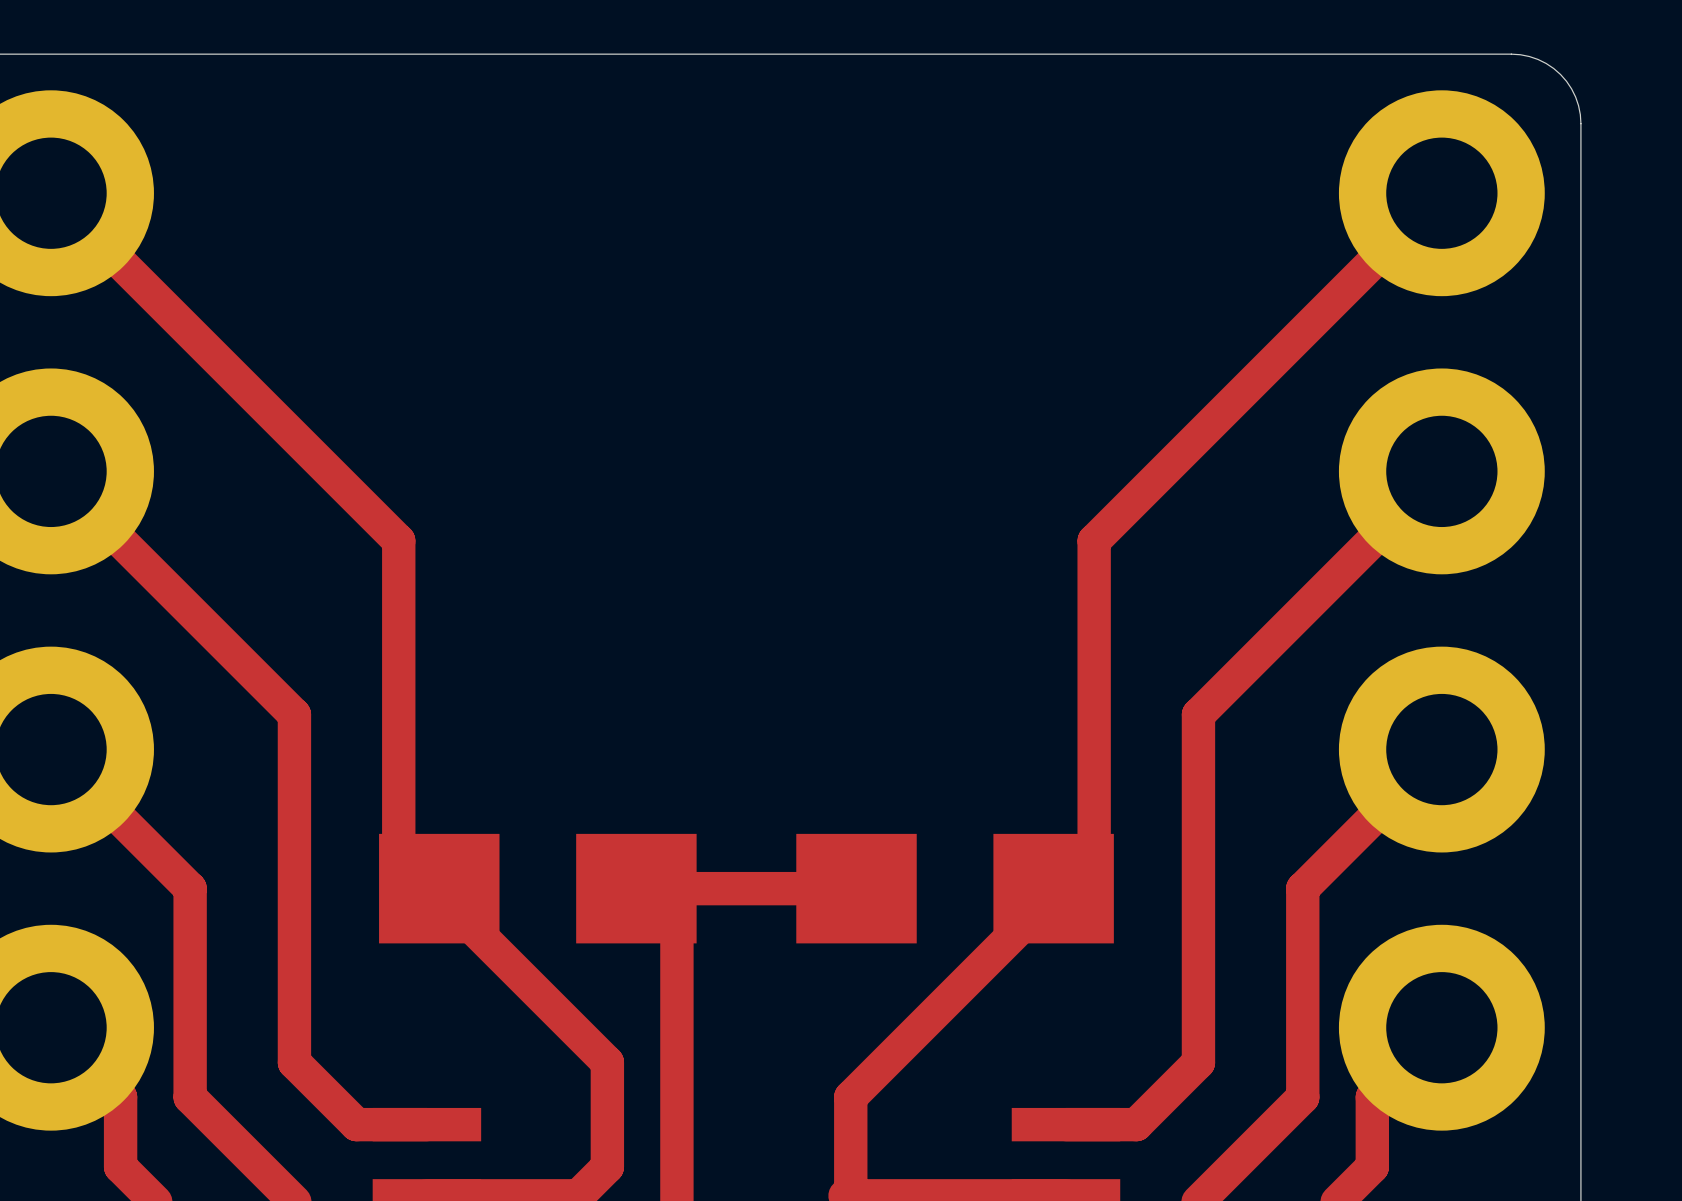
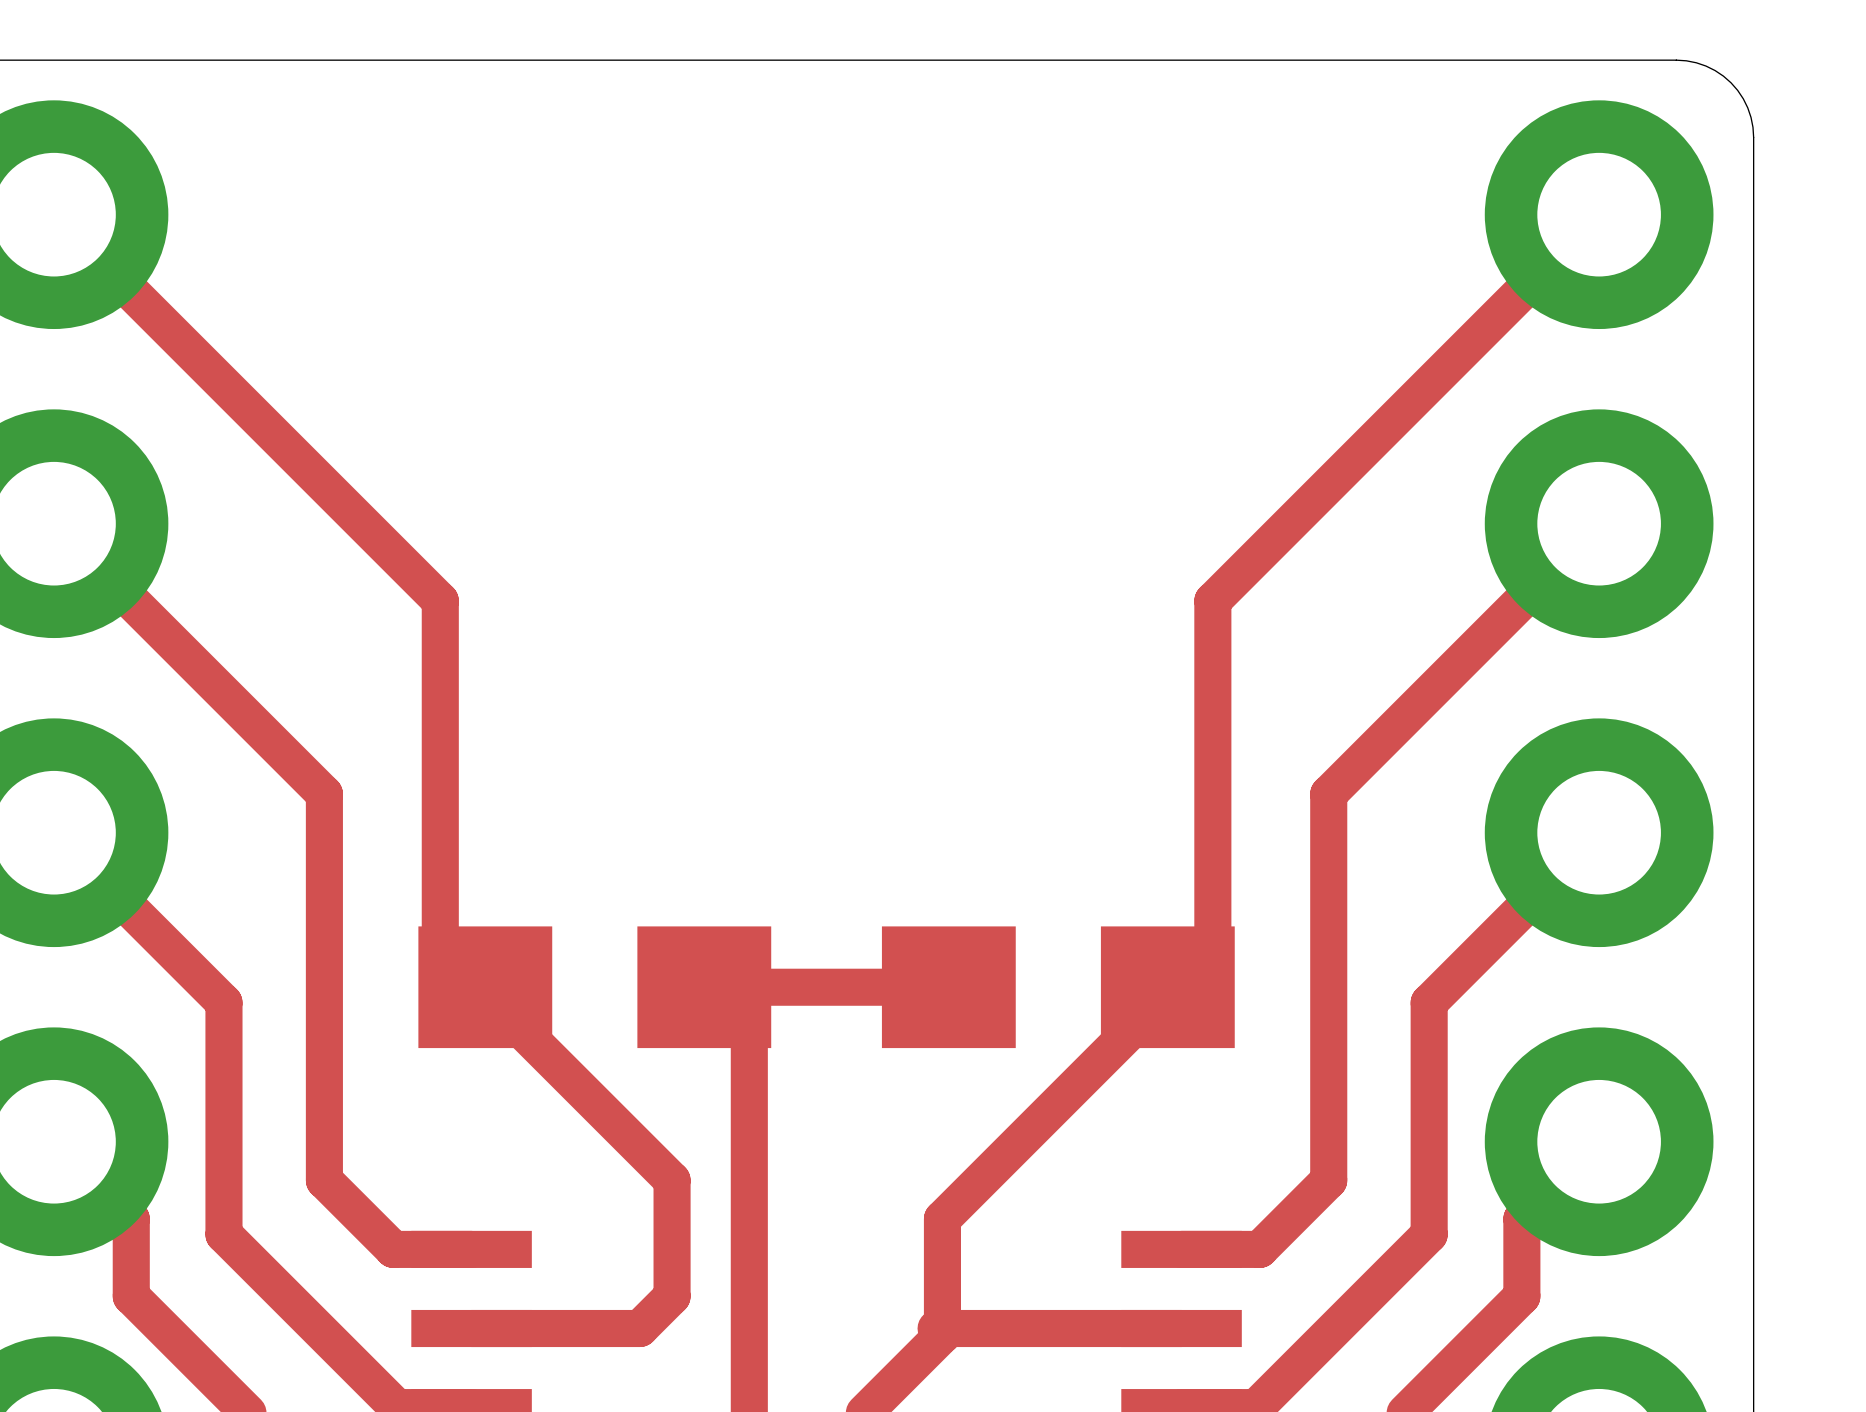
top track: (190, 888) (190, 1097) (204, 1111) -> (208, 987) (223, 1002) (223, 1234)
top track: (1302, 888) (1302, 1097) (1288, 1111) -> (1444, 987) (1429, 1002) (1429, 1234)

